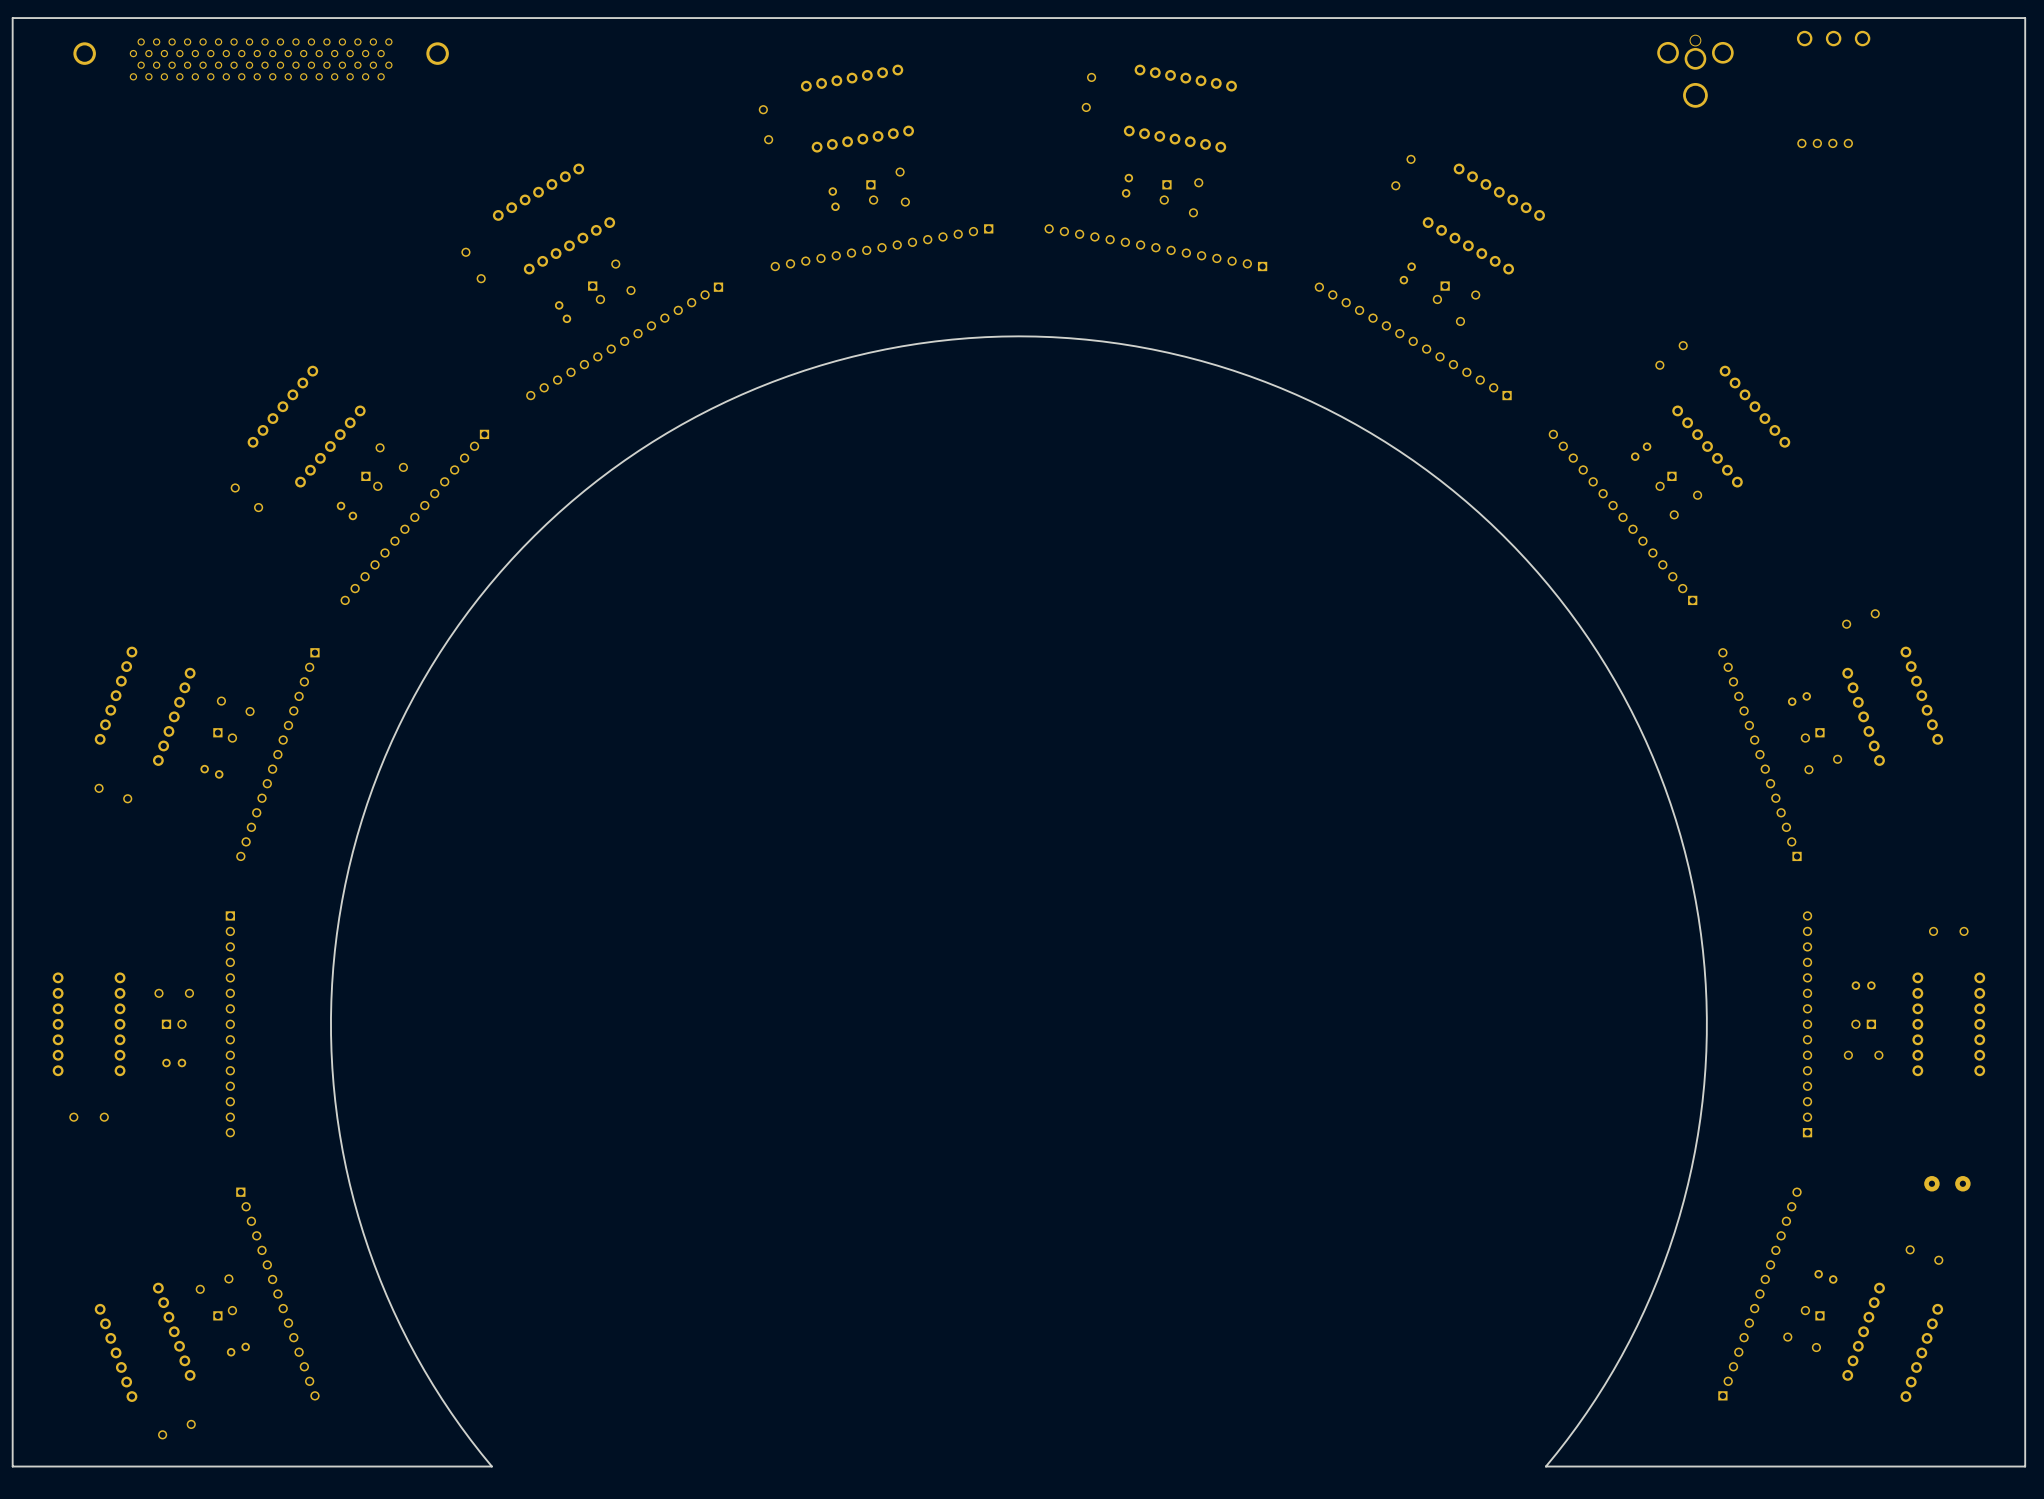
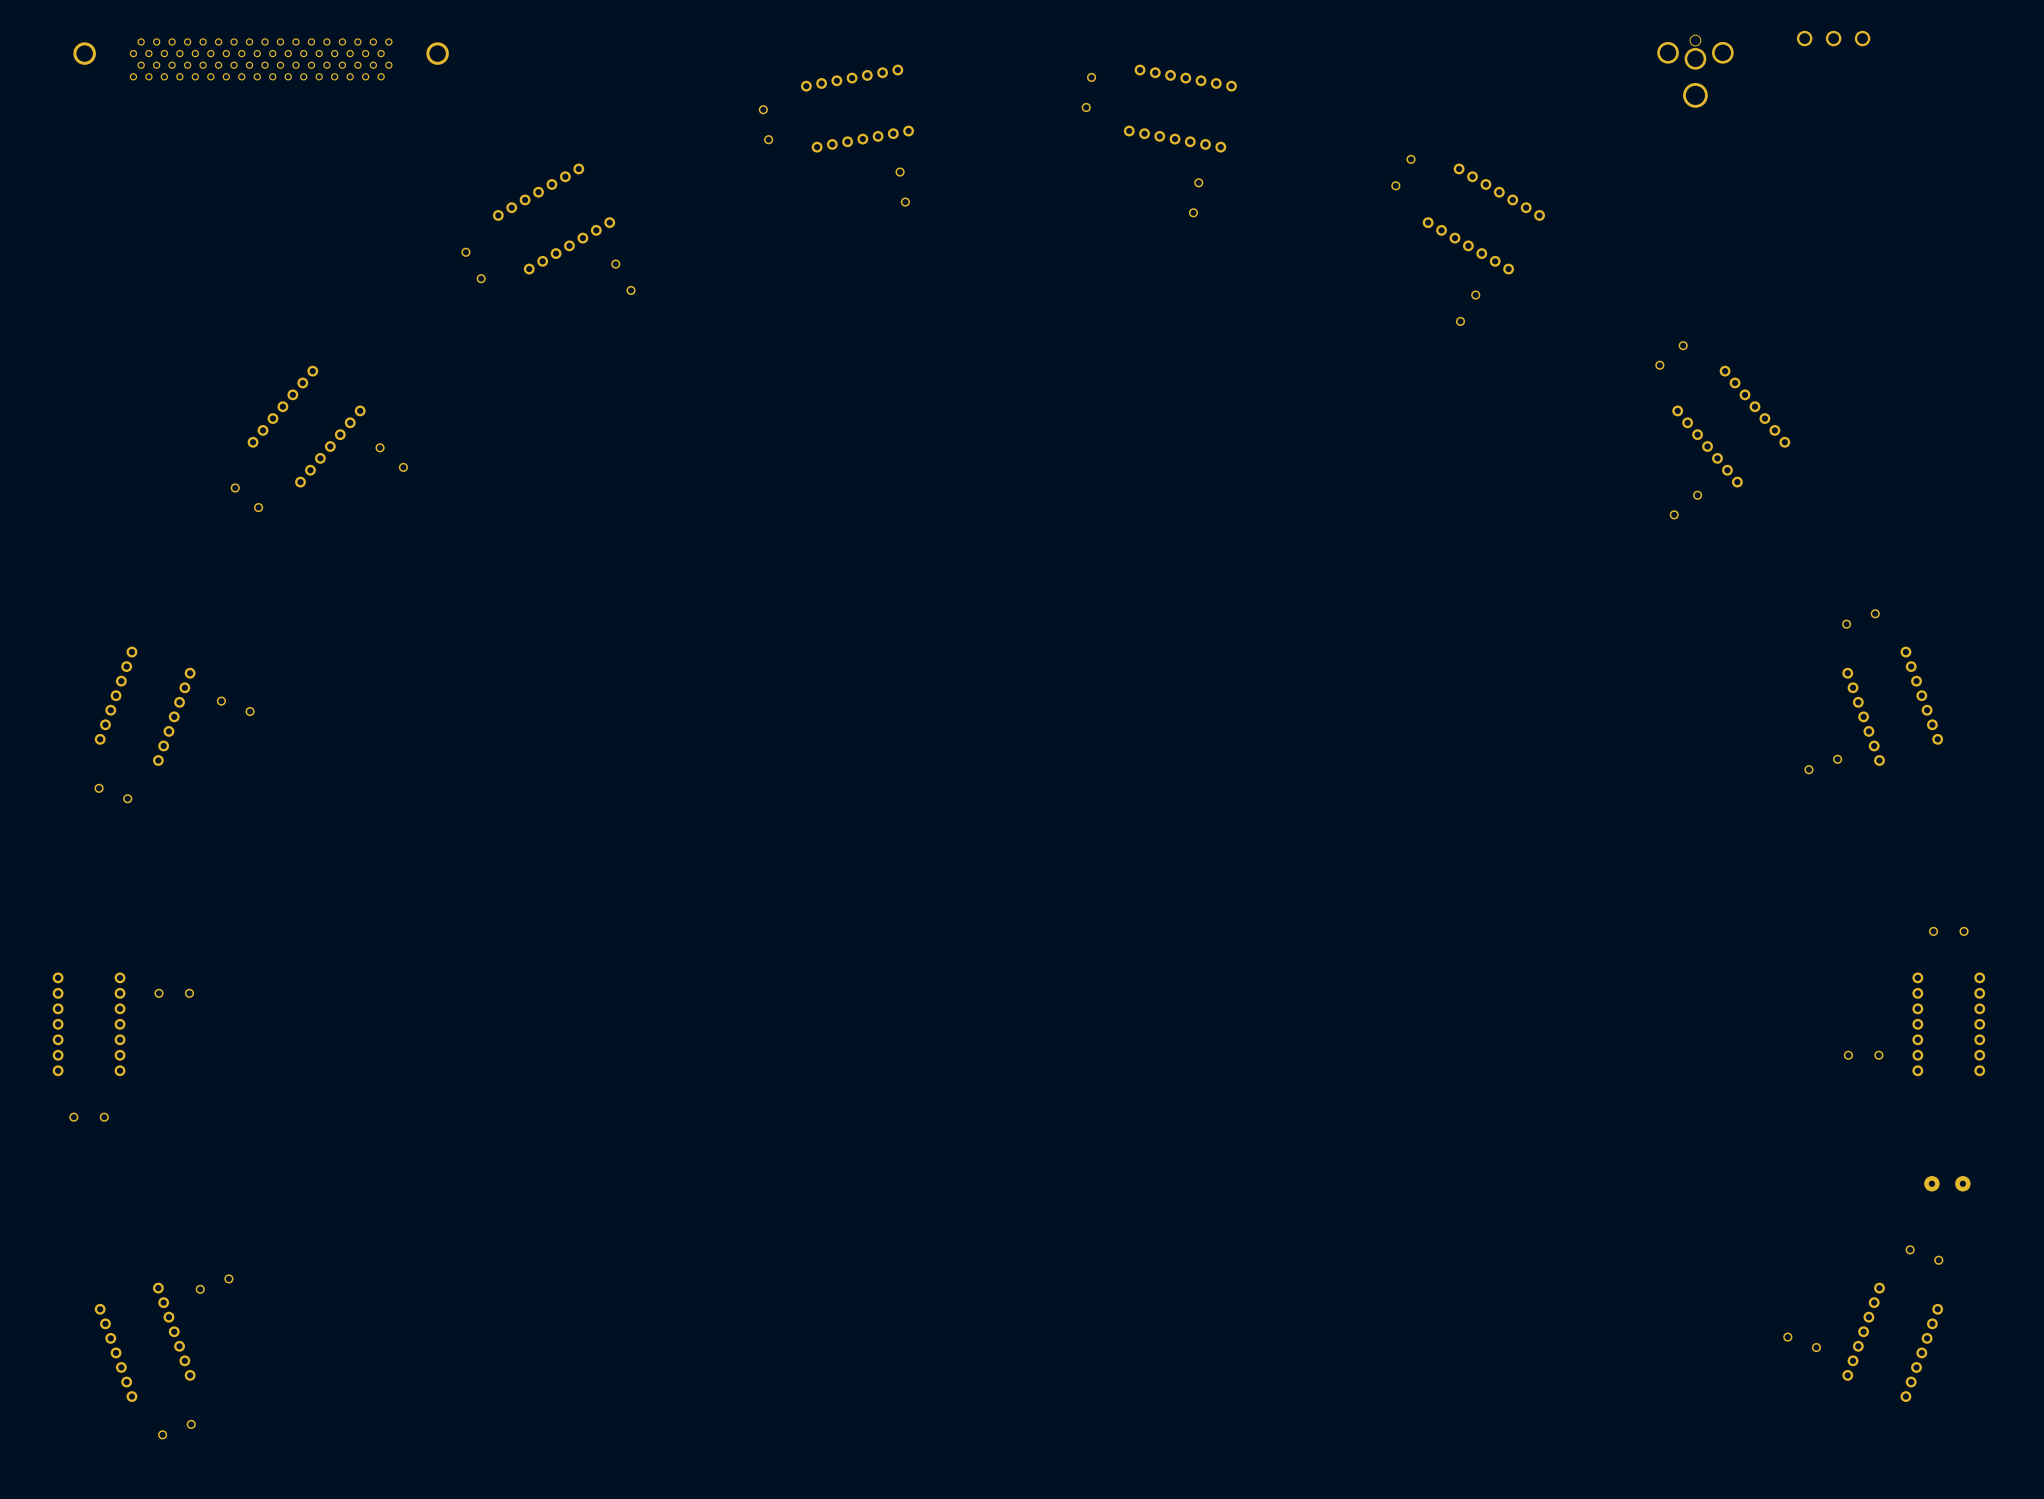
board edge: (2025, 18) (2025, 1466) (1545, 1466) (1576, 1426) (1604, 1384) (1629, 1341) (1651, 1295) (1679, 1216) (1691, 1167) (1700, 1118) (1706, 1034) (1705, 984) (1700, 934) (1692, 884) (1680, 835) (1664, 787) (1645, 741) (1623, 696) (1597, 652) (1548, 585) (1514, 547) (1478, 512) (1440, 480) (1399, 450) (1356, 424) (1311, 401) (1265, 381) (1217, 365) (1168, 352) (1119, 343) (1069, 338) (1018, 336) (968, 338) (918, 343) (869, 352) (820, 365) (772, 381) (726, 401) (681, 424) (638, 450) (597, 480) (559, 512) (522, 547) (489, 585) (439, 652) (414, 696) (391, 741) (372, 787) (357, 835) (345, 884) (336, 934) (332, 984) (331, 1034) (337, 1118) (346, 1167) (358, 1216) (386, 1295) (408, 1341) (433, 1384) (460, 1426) (491, 1466) (12, 1466) (12, 18) (2025, 18) -> none
part: (1825, 143) -> none
part: (1127, 185) -> none
part: (872, 192) -> none
part: (1165, 192) -> none
part: (834, 199) -> none
part: (881, 247) -> none
part: (1155, 247) -> none
part: (1407, 273) -> none
part: (596, 292) -> none
part: (1441, 292) -> none
part: (563, 312) -> none
part: (624, 341) -> none
part: (1413, 341) -> none
part: (1641, 451) -> none
part: (371, 481) -> none
part: (1666, 481) -> none
part: (346, 510) -> none
part: (414, 517) -> none
part: (1623, 517) -> none
part: (1799, 699) -> none
part: (225, 735) -> none
part: (1812, 735) -> none
part: (277, 754) -> none
part: (1759, 754) -> none
part: (211, 771) -> none
part: (1863, 985) -> none
part: (174, 1024) -> none
part: (230, 1024) -> none
part: (1807, 1024) -> none
part: (1863, 1024) -> none
part: (174, 1063) -> none
part: (1825, 1276) -> none
part: (277, 1294) -> none
part: (1759, 1294) -> none
part: (225, 1313) -> none
part: (1812, 1313) -> none
part: (238, 1349) -> none

